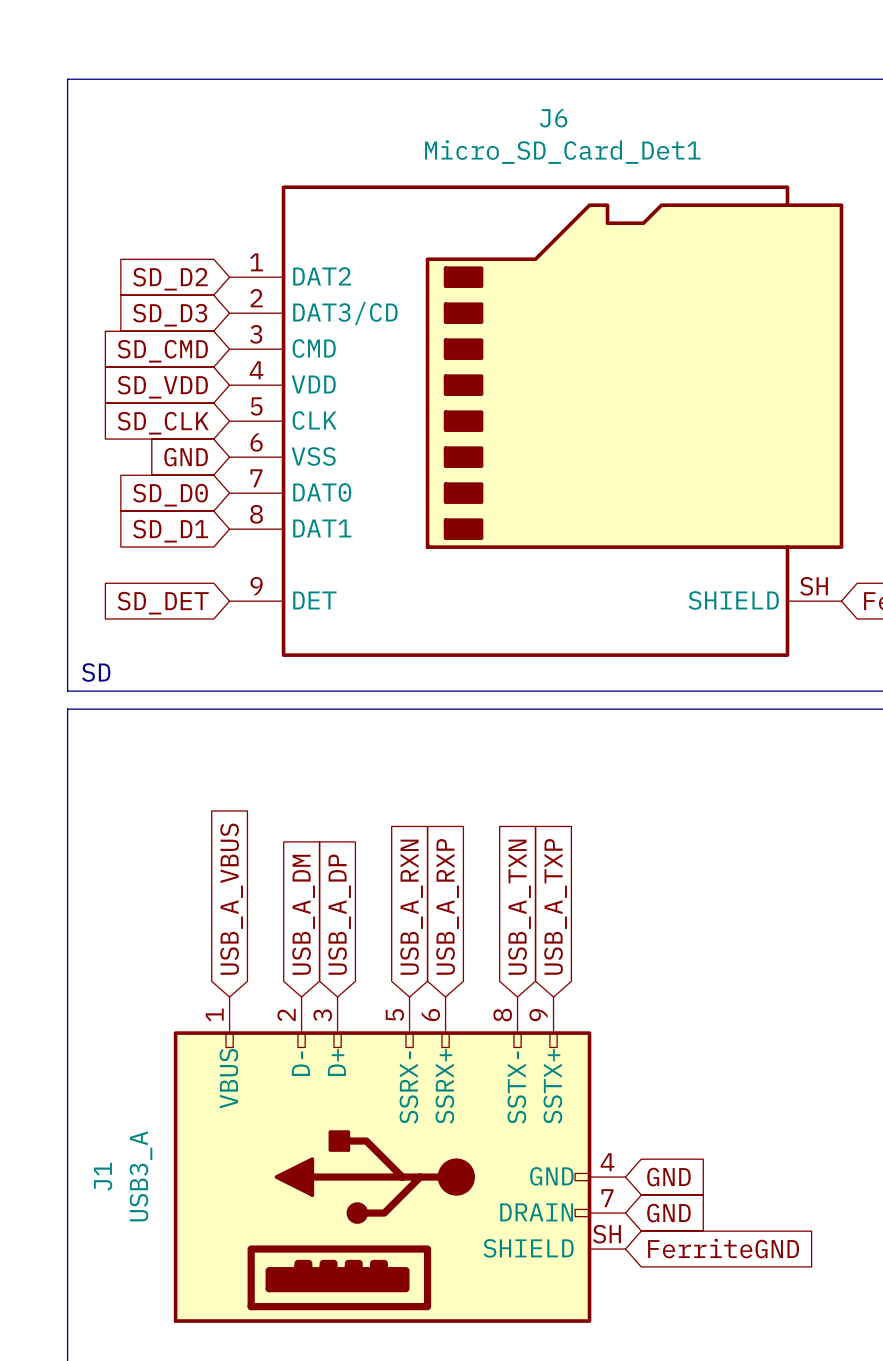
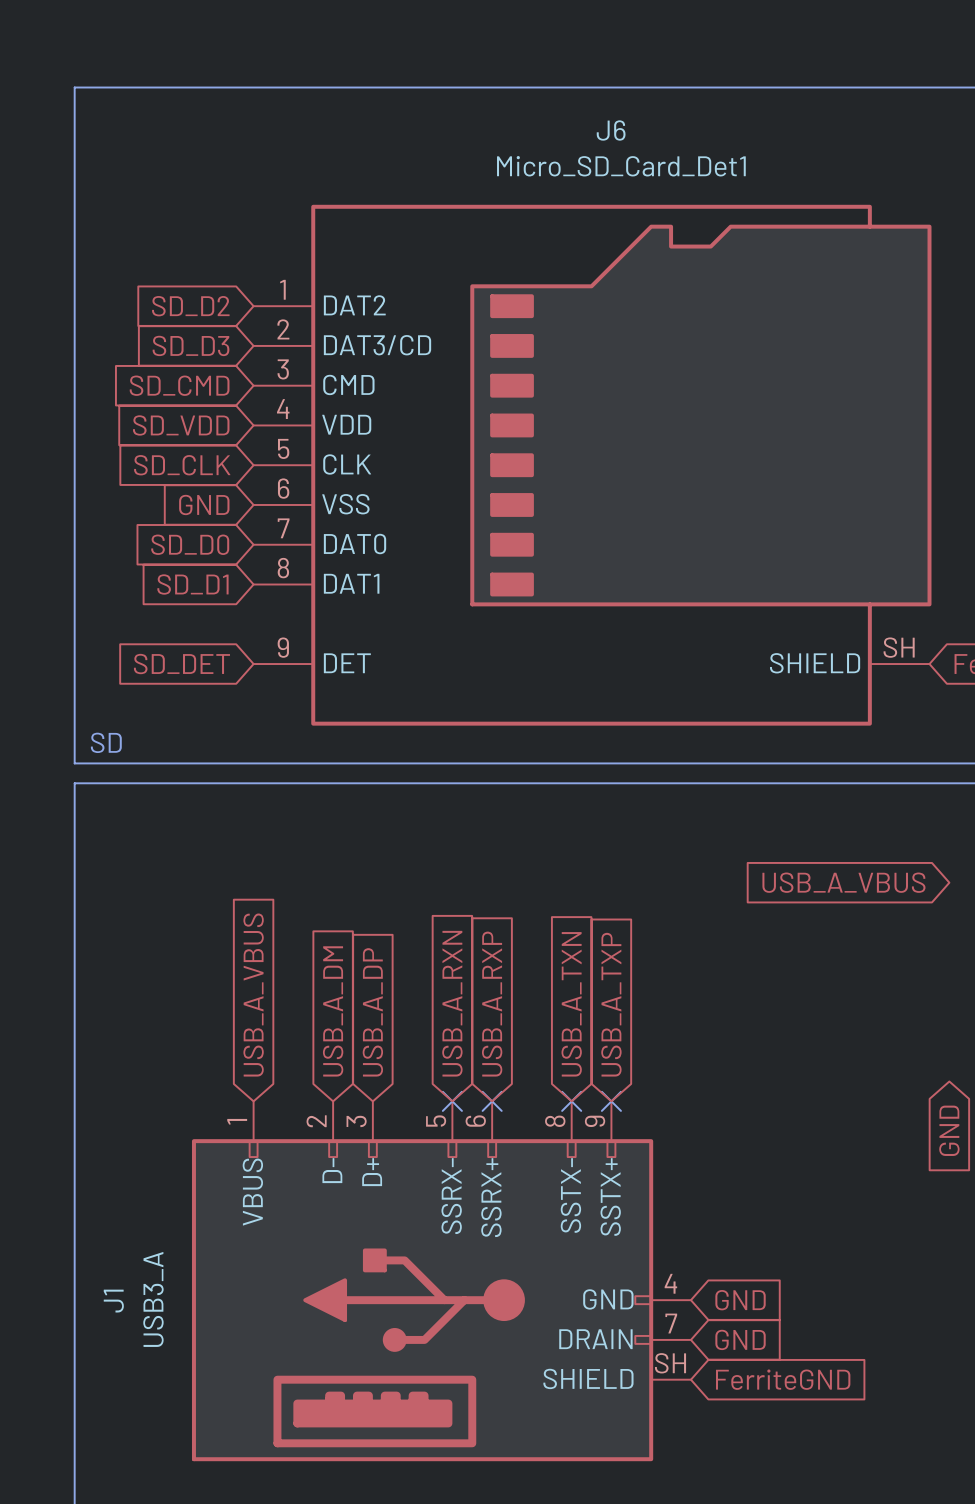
global label: none -> USB_A_VBUS (843, 882)
no-connect mark: none -> (452, 1101)
no-connect mark: none -> (492, 1101)
no-connect mark: none -> (571, 1101)
no-connect mark: none -> (611, 1101)
global label: none -> GND (949, 1130)

